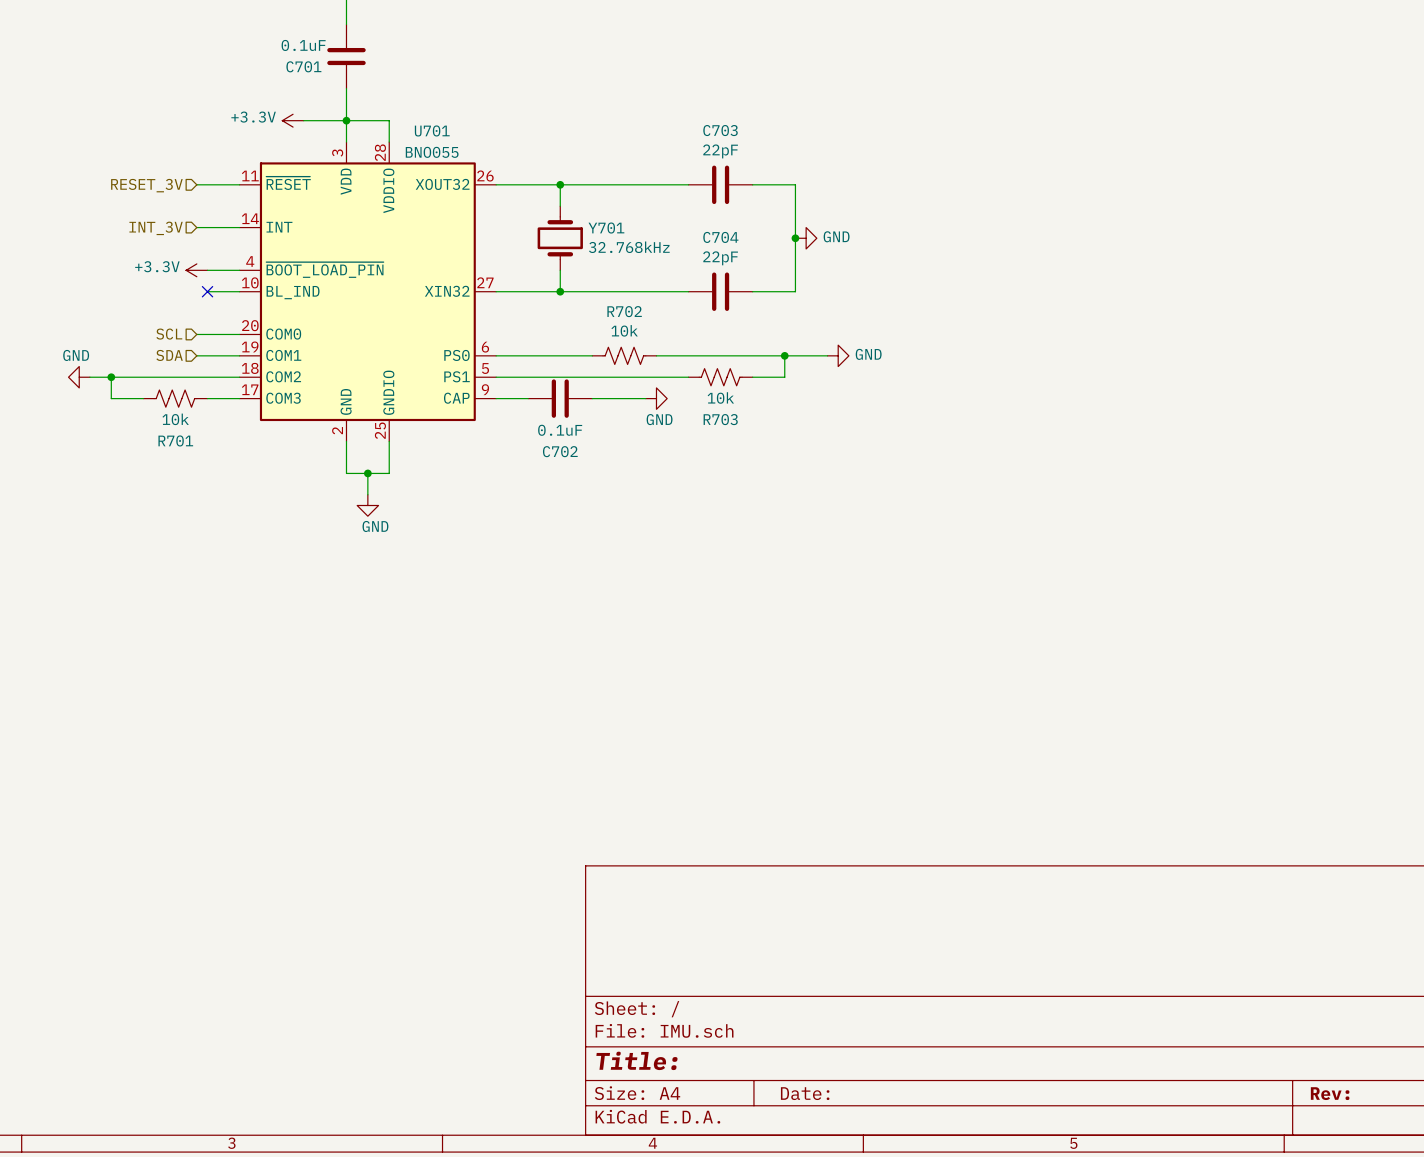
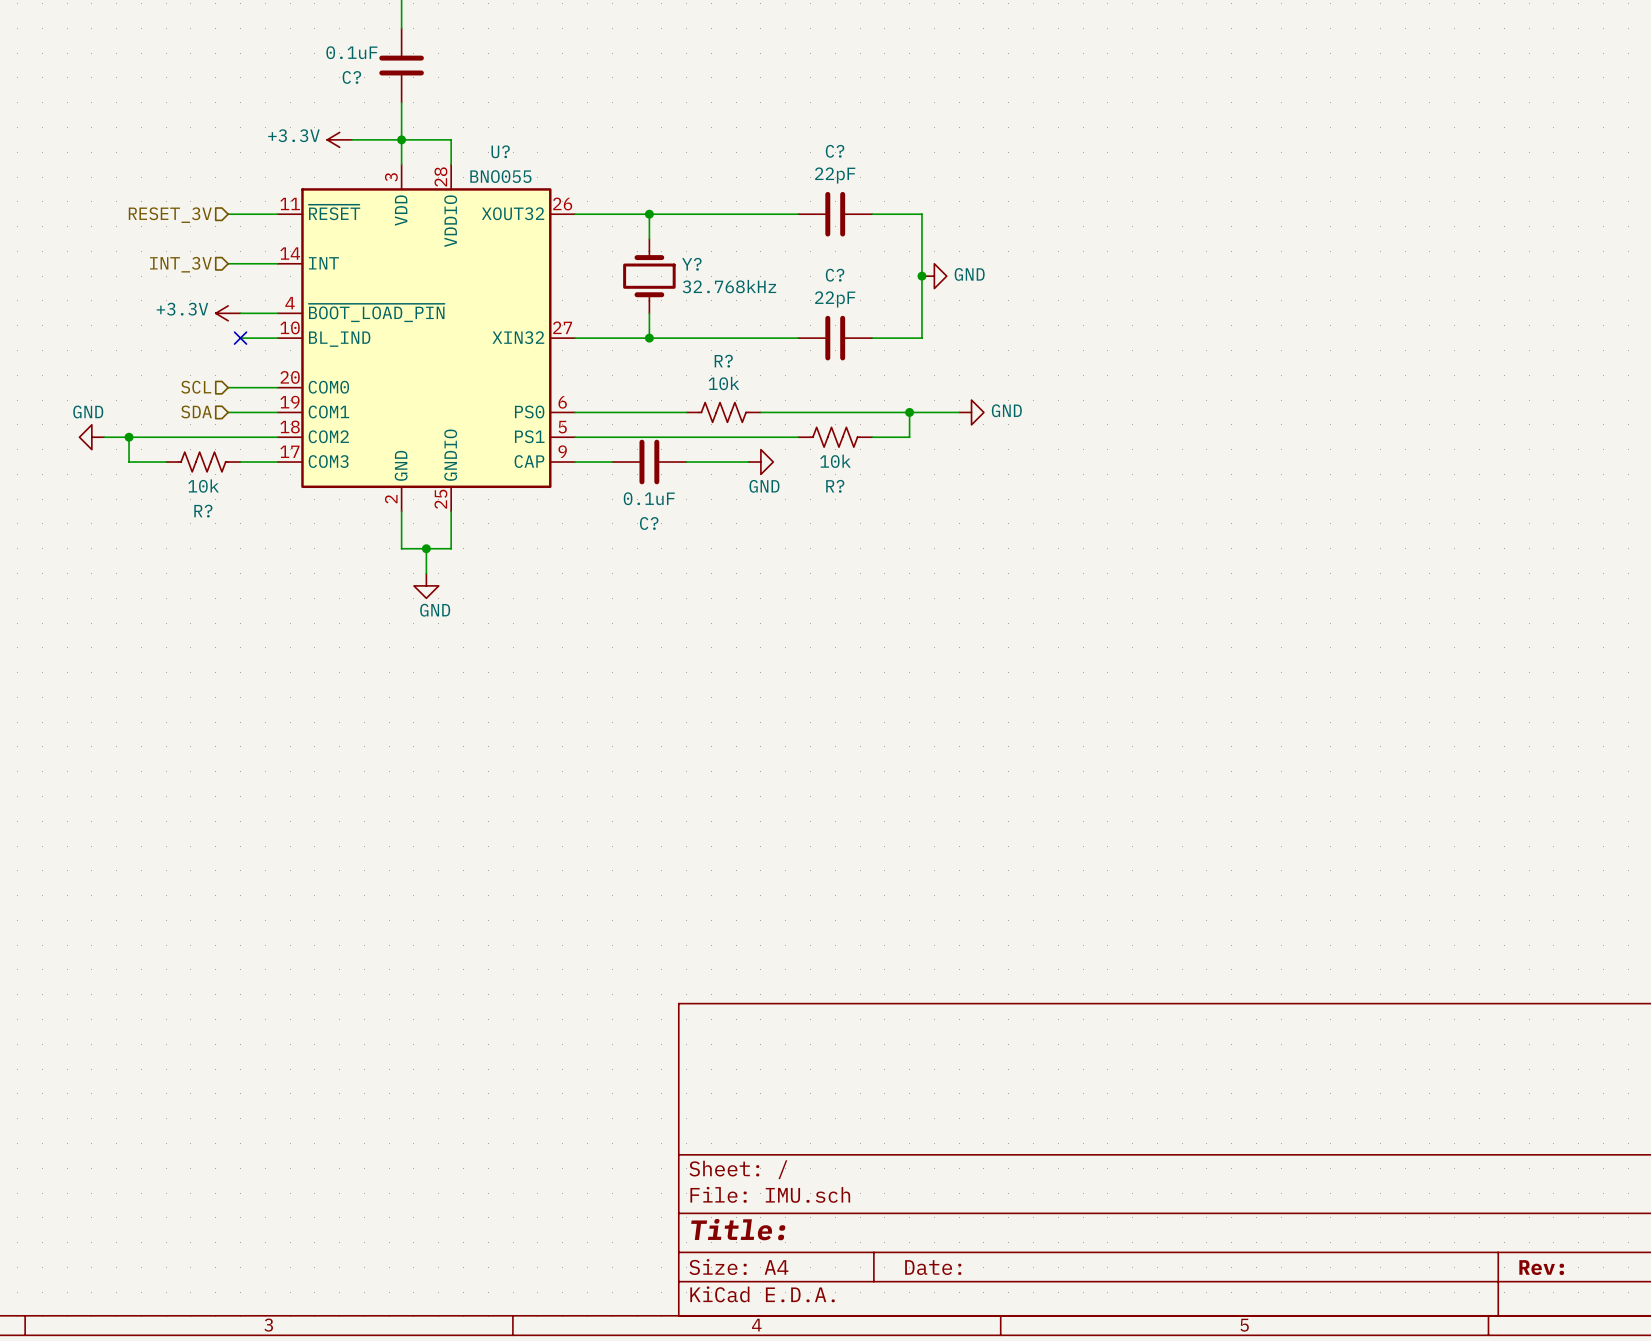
C701 name: C701 (303, 66) -> C? (351, 77)
U701 name: U701 (432, 130) -> U? (500, 151)
C703 name: C703 (720, 130) -> C? (835, 151)
Y701 name: Y701 (606, 228) -> Y? (691, 264)
C704 name: C704 (720, 237) -> C? (835, 275)
R702 name: R702 (624, 311) -> R? (723, 361)
R703 name: R703 (720, 419) -> R? (835, 486)
R701 name: R701 (175, 440) -> R? (203, 511)
C702 name: C702 (560, 451) -> C? (649, 523)

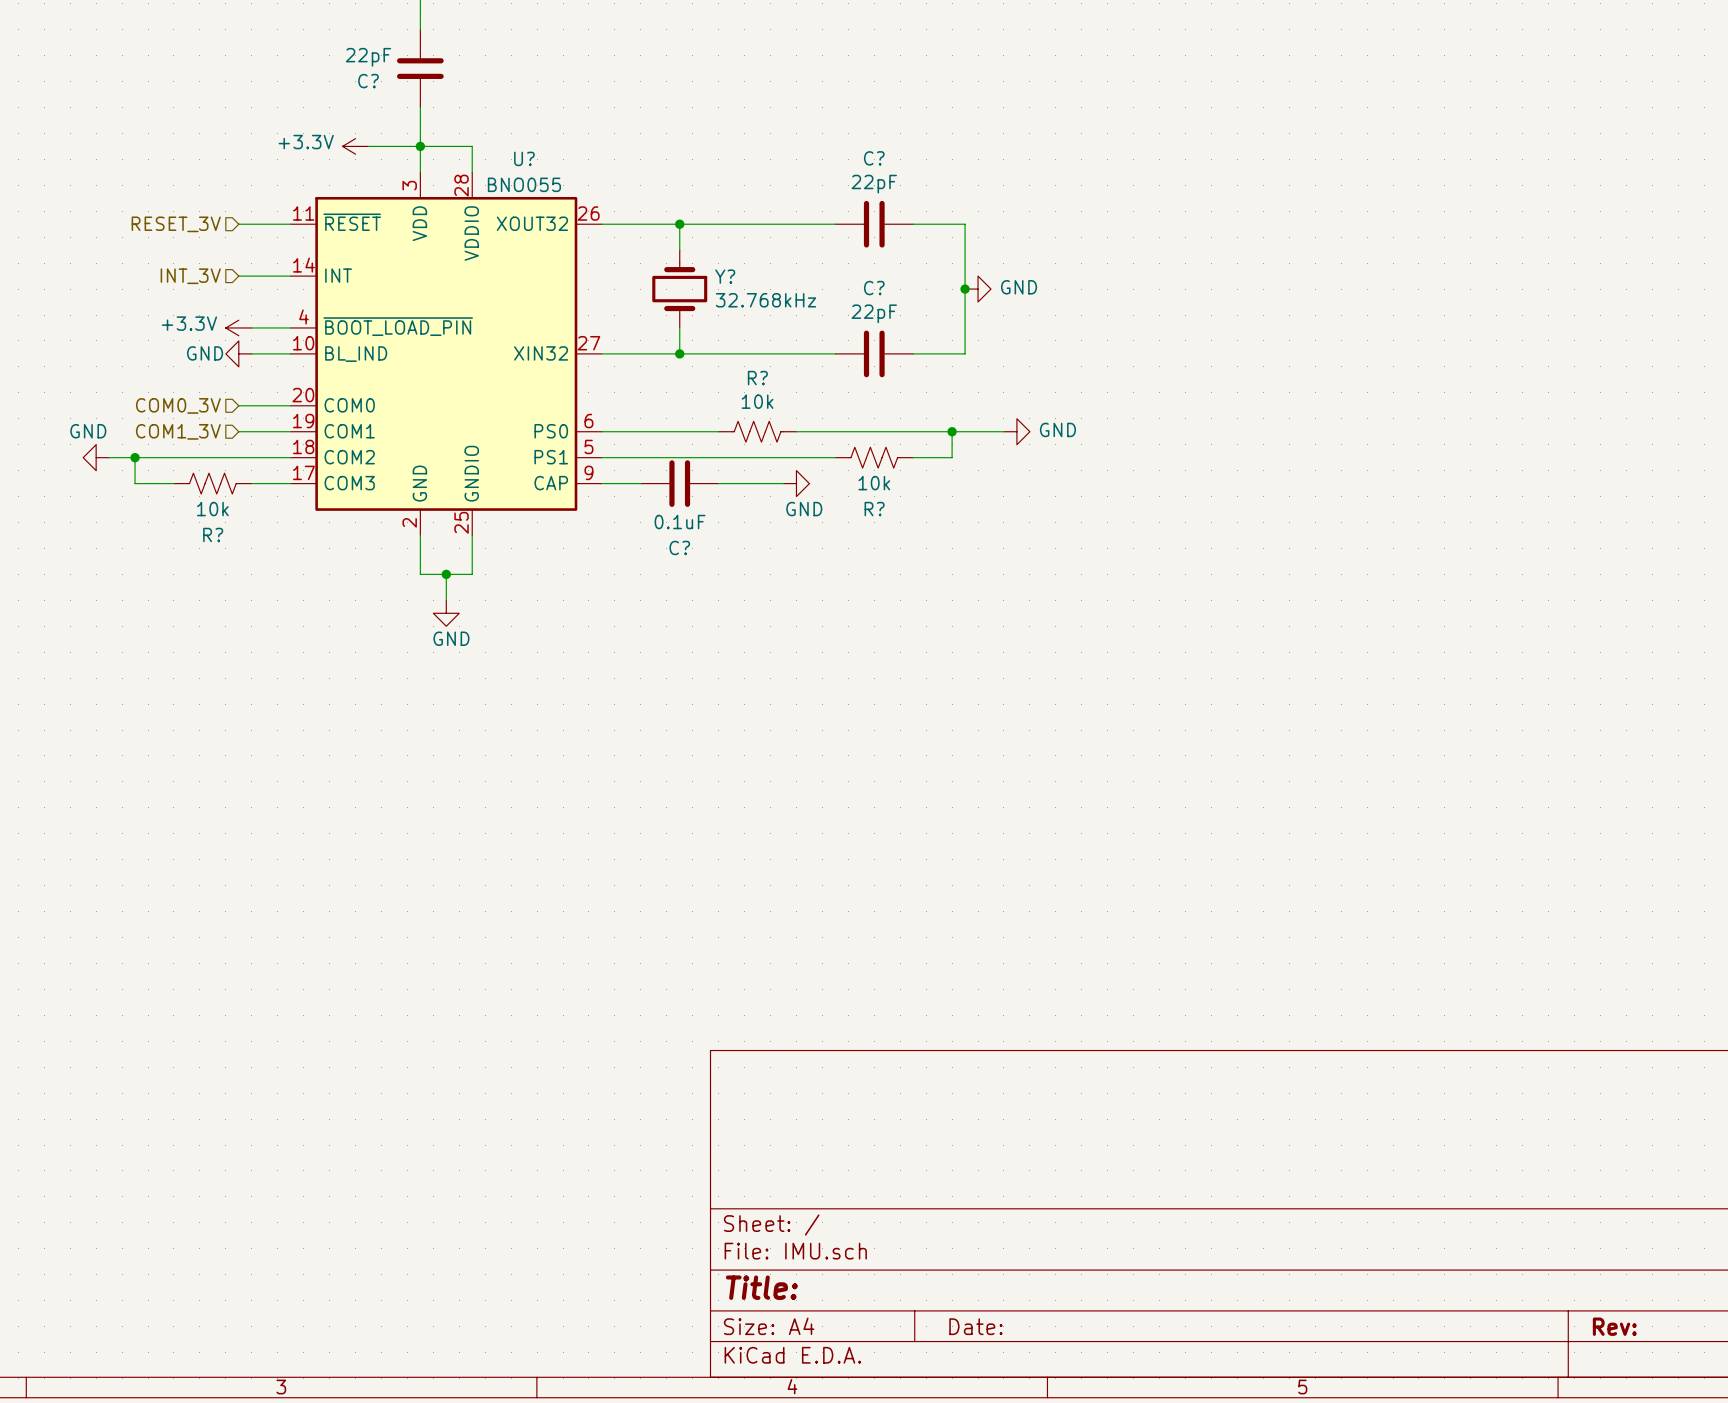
C? value: 0.1uF (351, 52) -> 22pF (368, 57)
power symbol: none -> GND (238, 353)
no-connect mark: (240, 338) -> none
hierarchical label: SCL (196, 387) -> COM0_3V (178, 405)
hierarchical label: SDA (196, 411) -> COM1_3V (178, 431)

